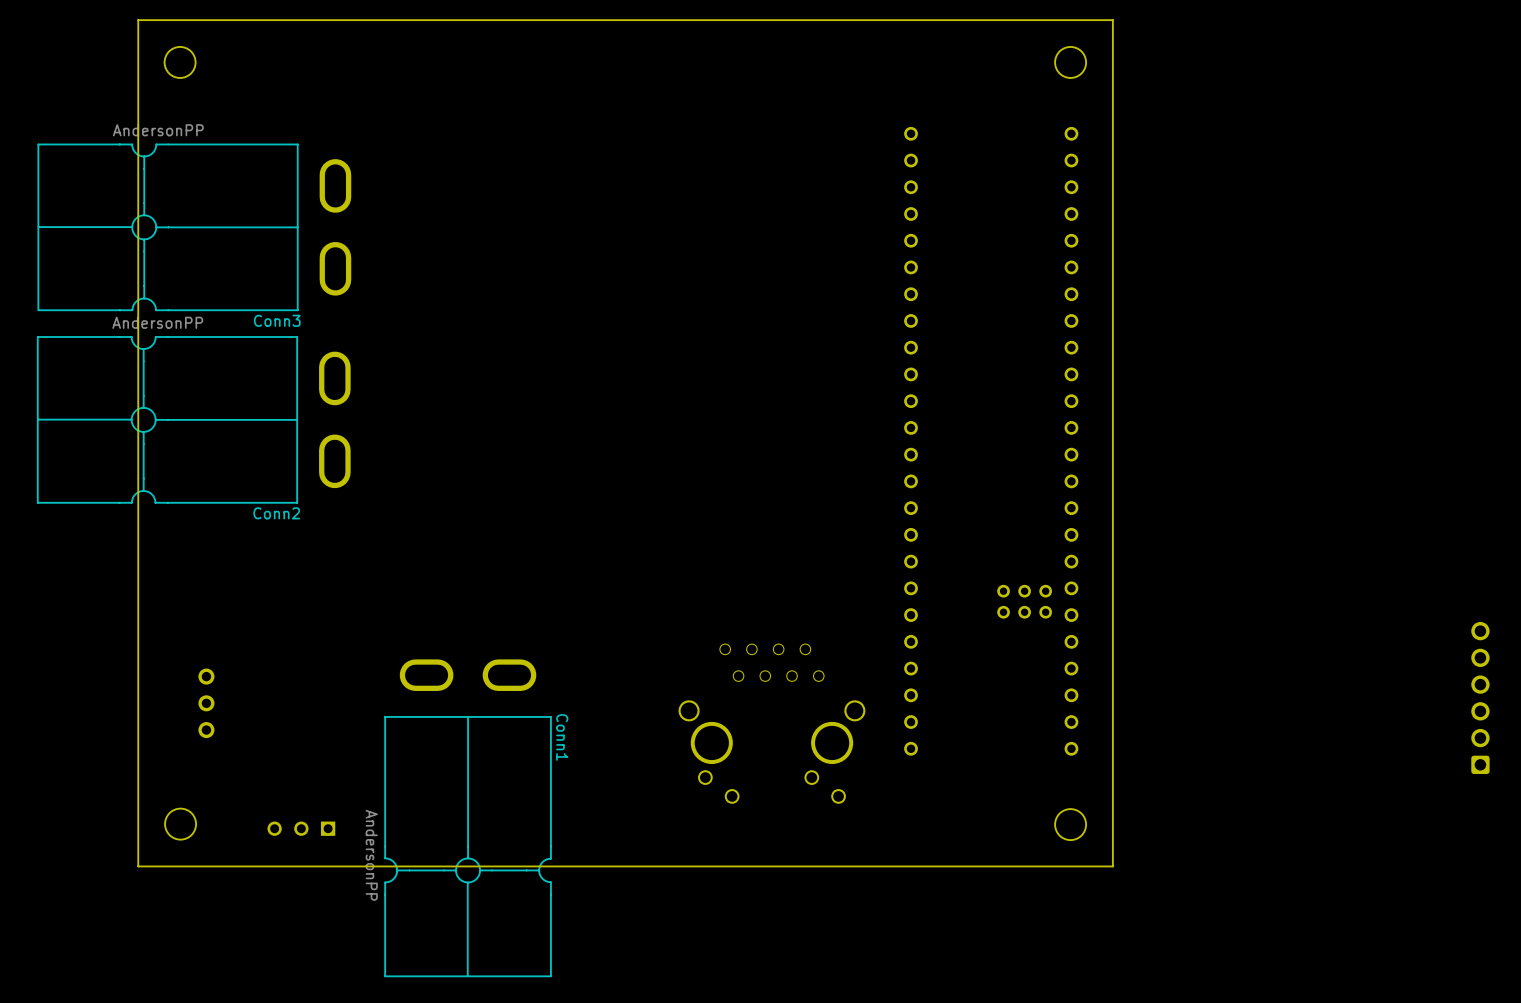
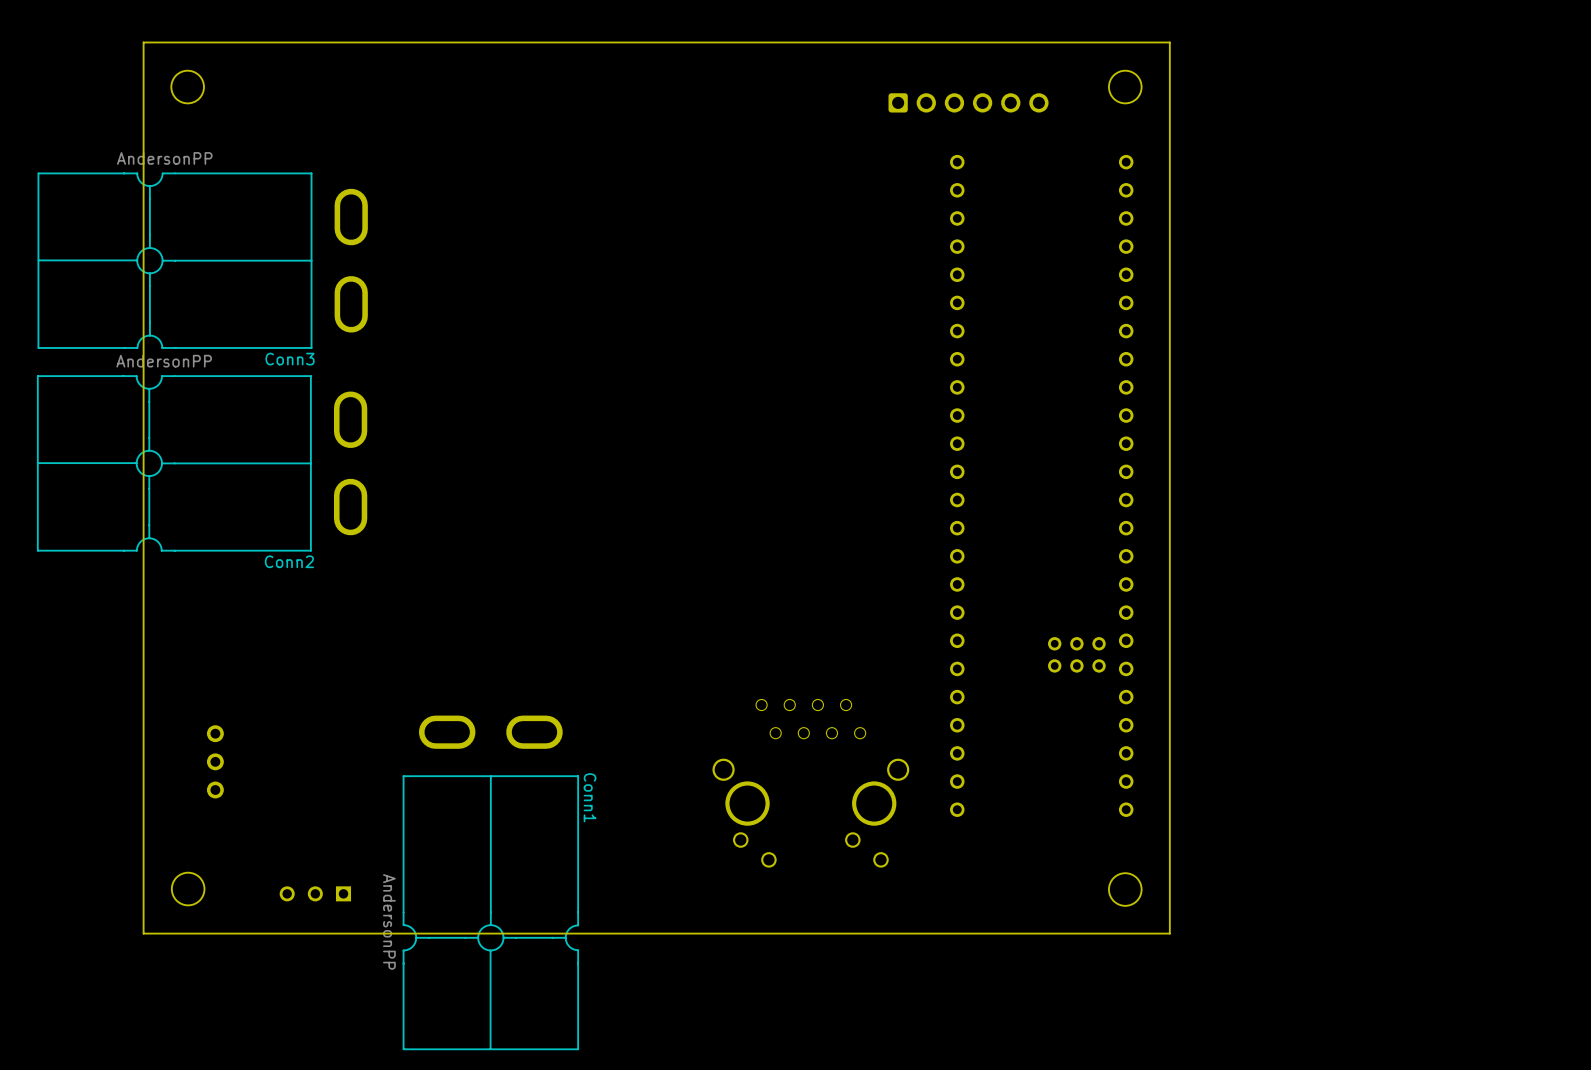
part: none -> (968, 102)
part: (1480, 697) -> none

